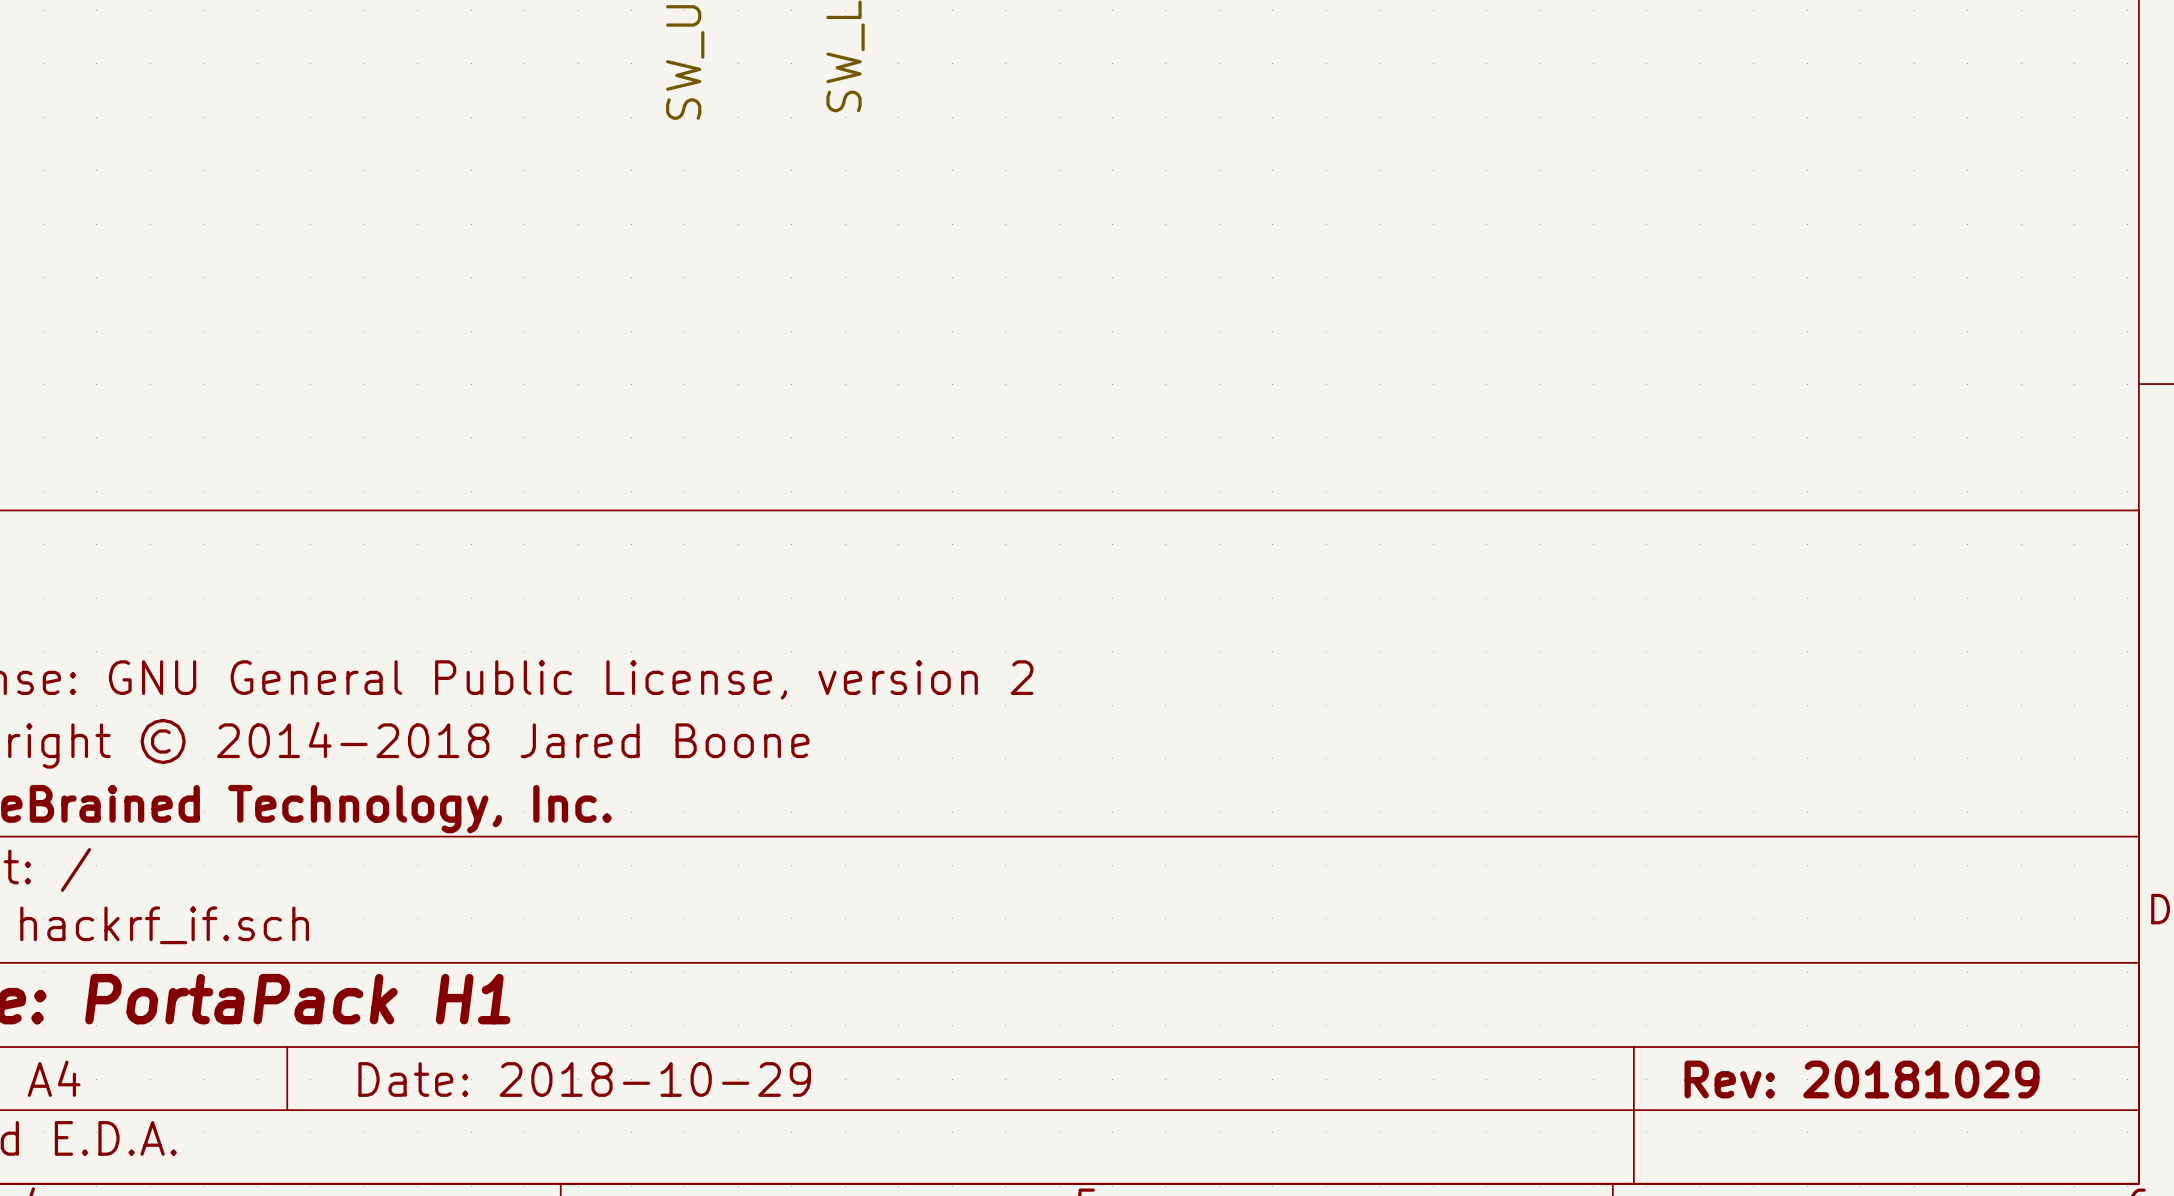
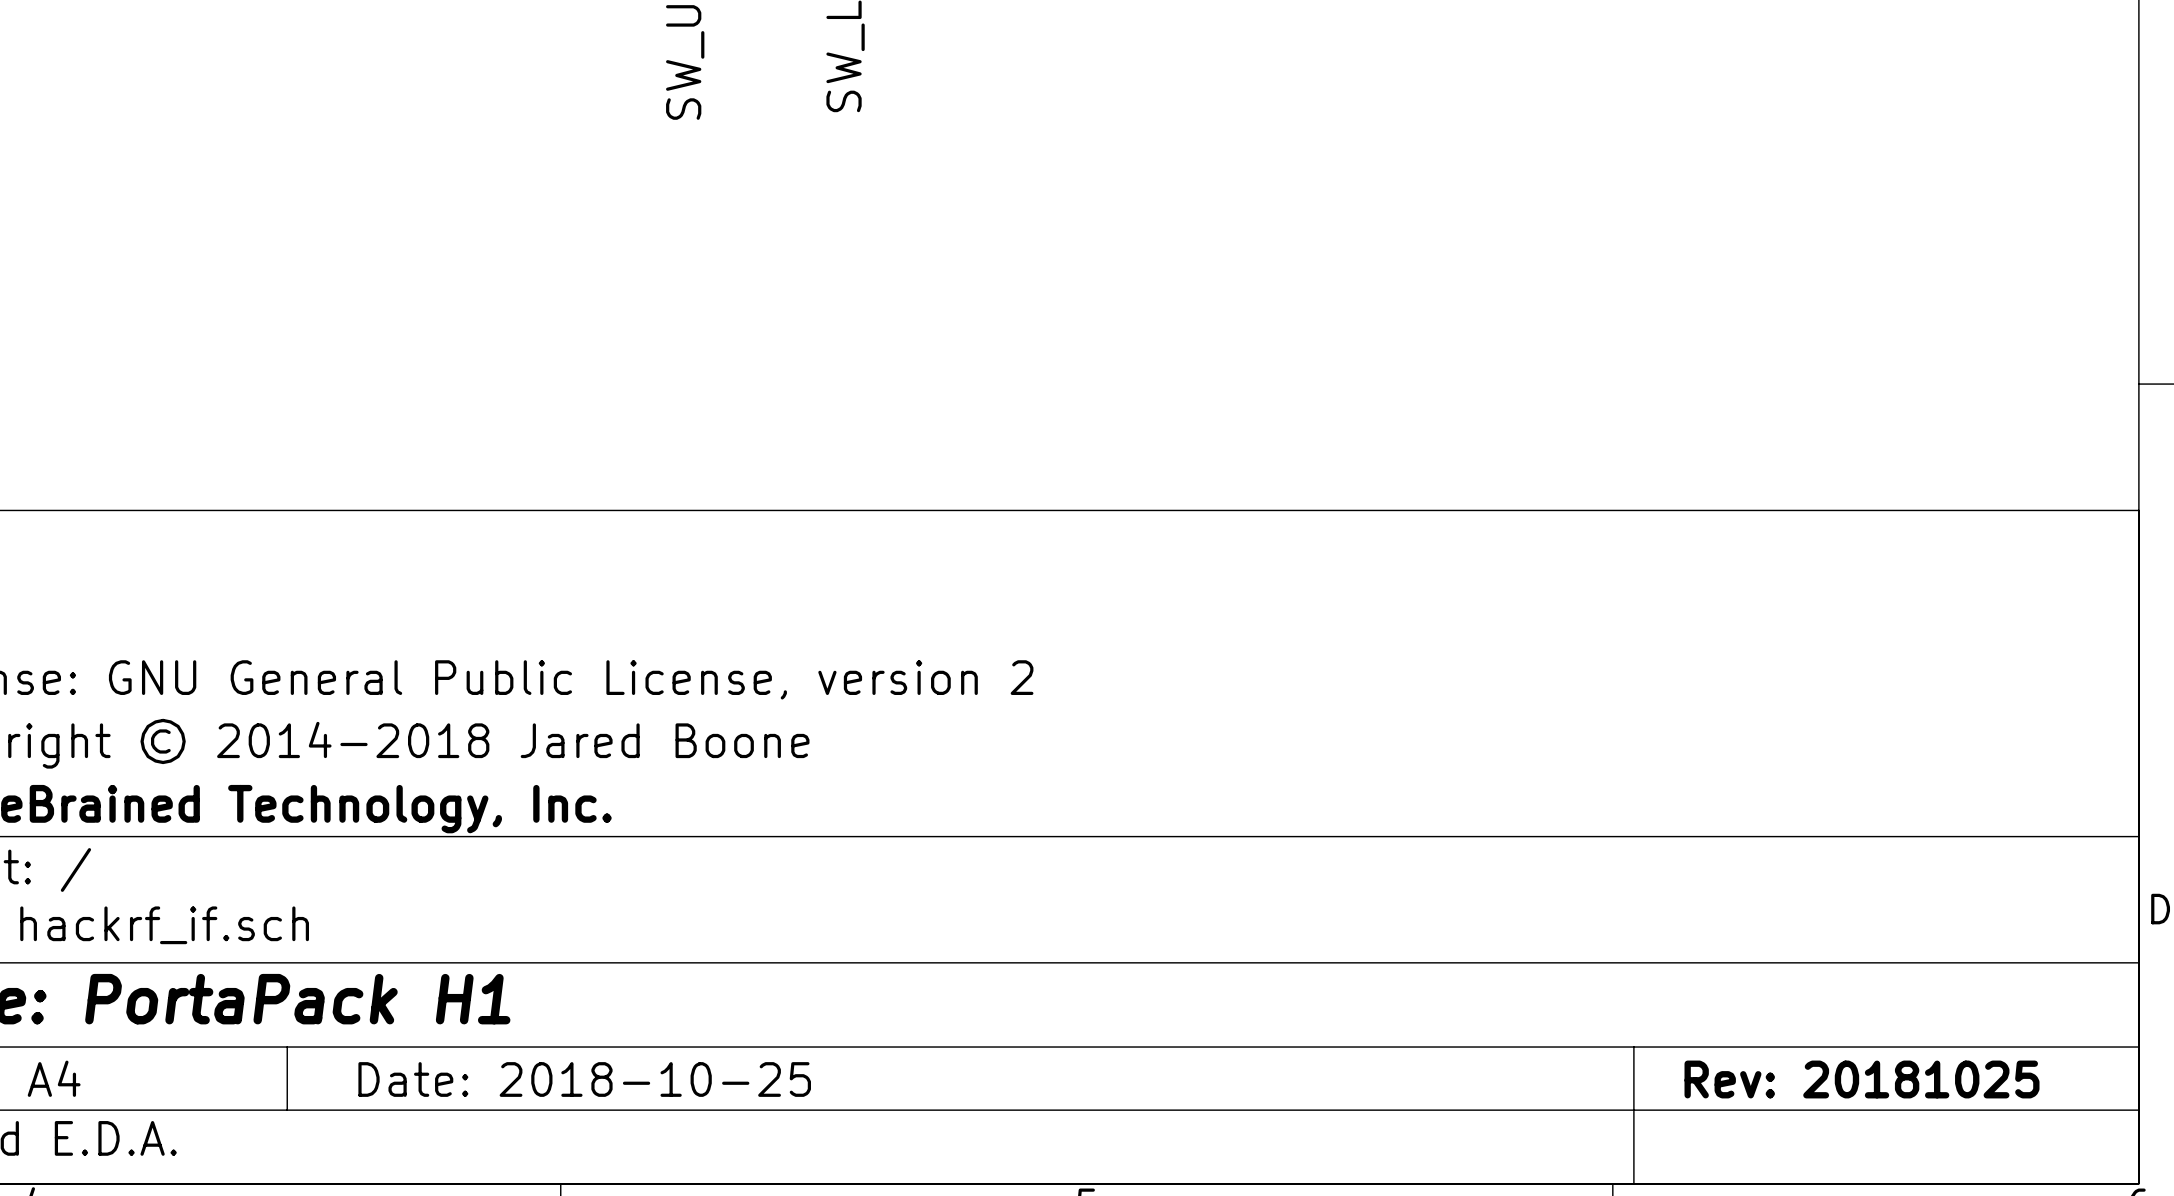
title block: Date: 2018-10-29 (584, 1079) -> Date: 2018-10-25 (584, 1079)
title block: Rev: 20181029 (1862, 1079) -> Rev: 20181025 (1862, 1079)

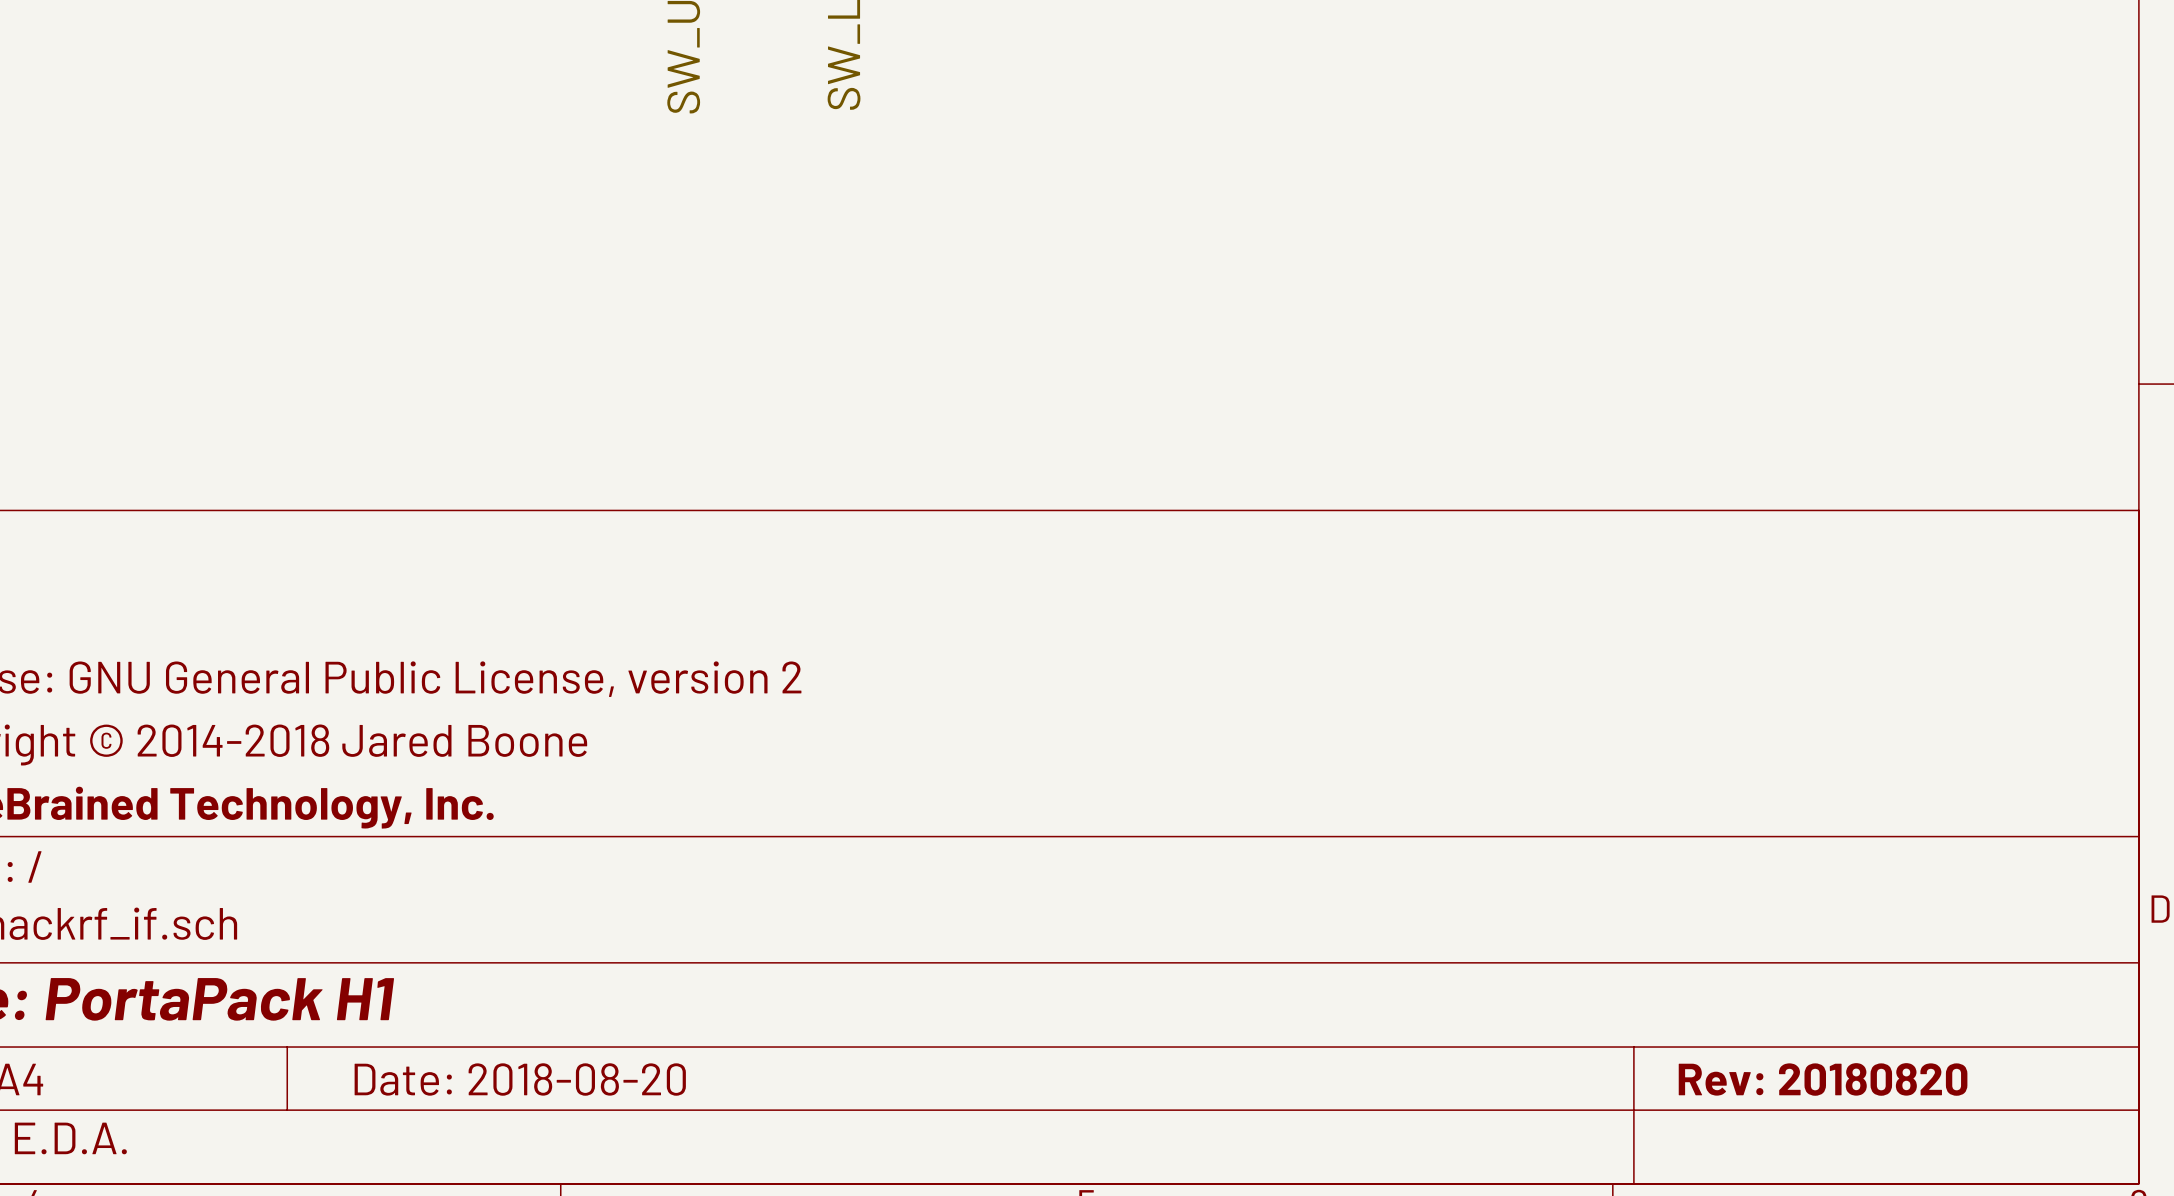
title block: Date: 2018-10-25 (584, 1079) -> Date: 2018-08-20 (520, 1079)
title block: Rev: 20181025 (1862, 1079) -> Rev: 20180820 (1823, 1079)

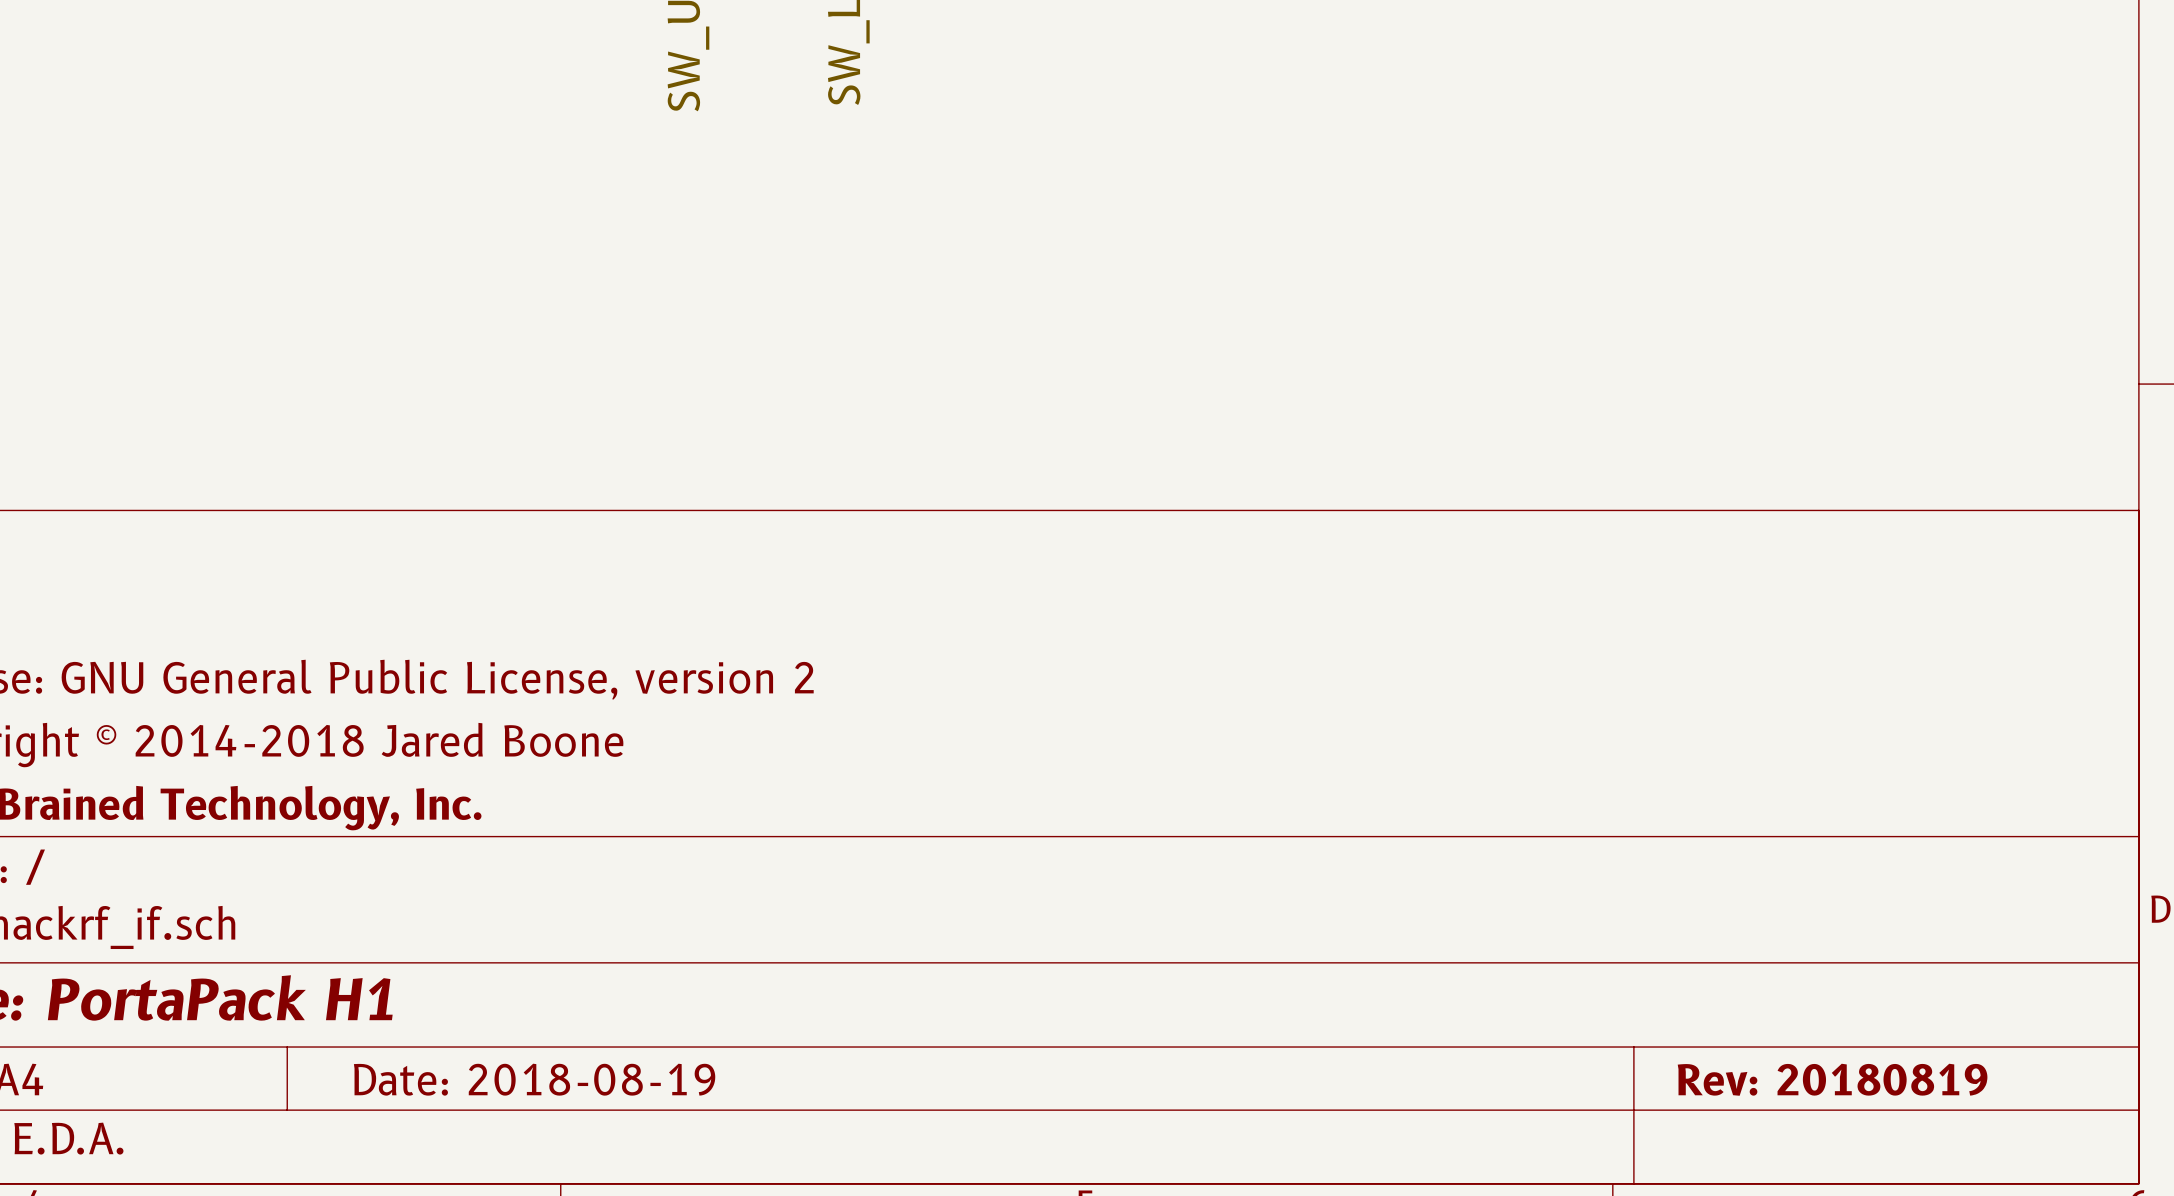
title block: Date: 2018-08-20 (520, 1079) -> Date: 2018-08-19 (534, 1079)
title block: Rev: 20180820 (1823, 1079) -> Rev: 20180819 (1832, 1079)

